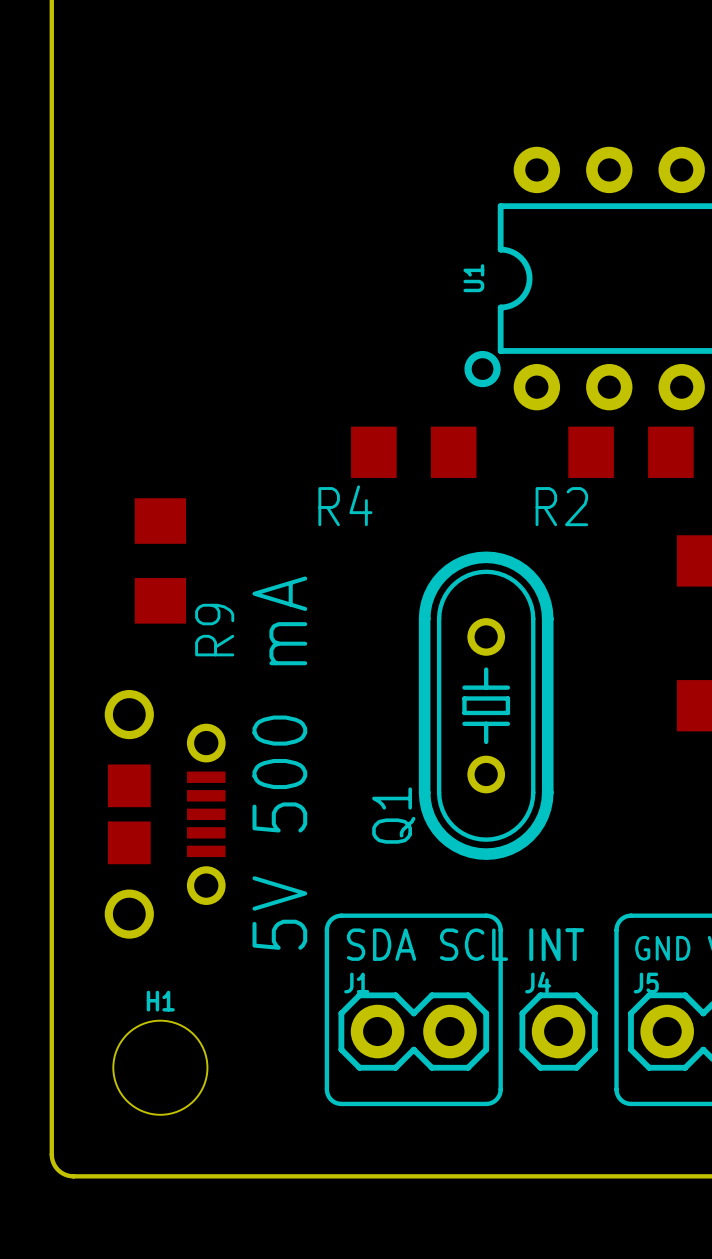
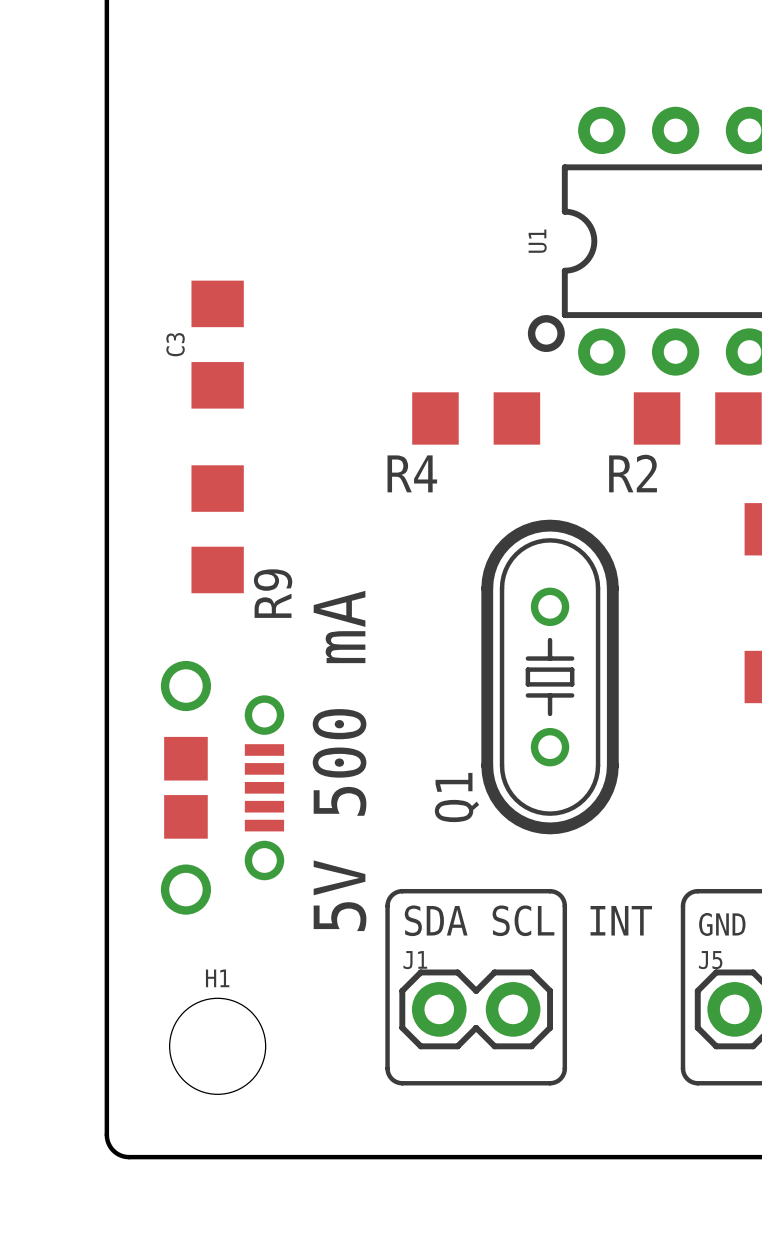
C3: none -> (217, 344)
J4: (558, 1031) -> none

